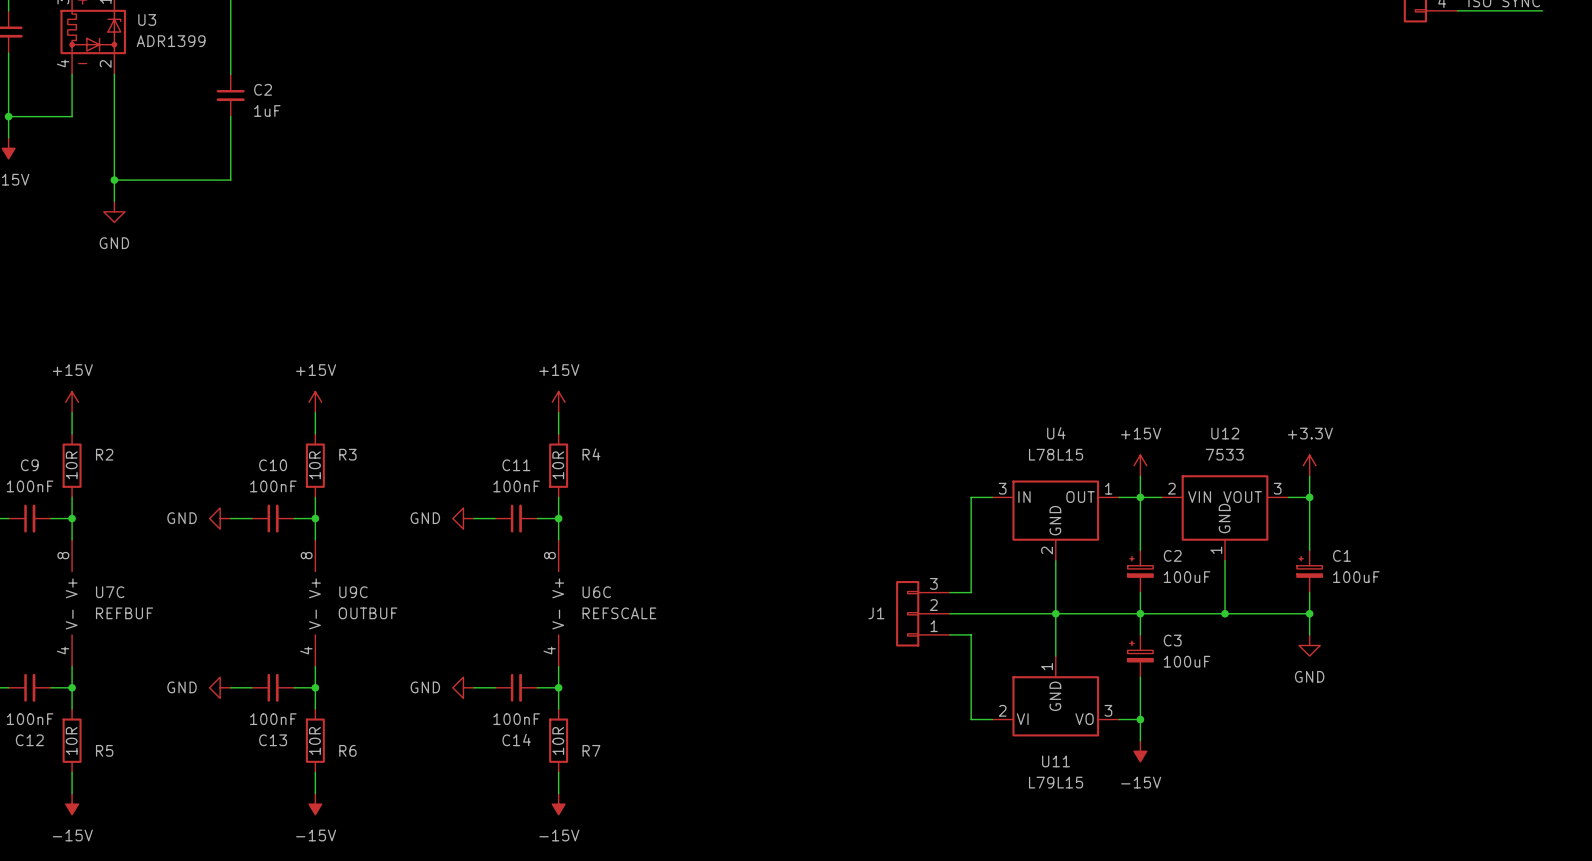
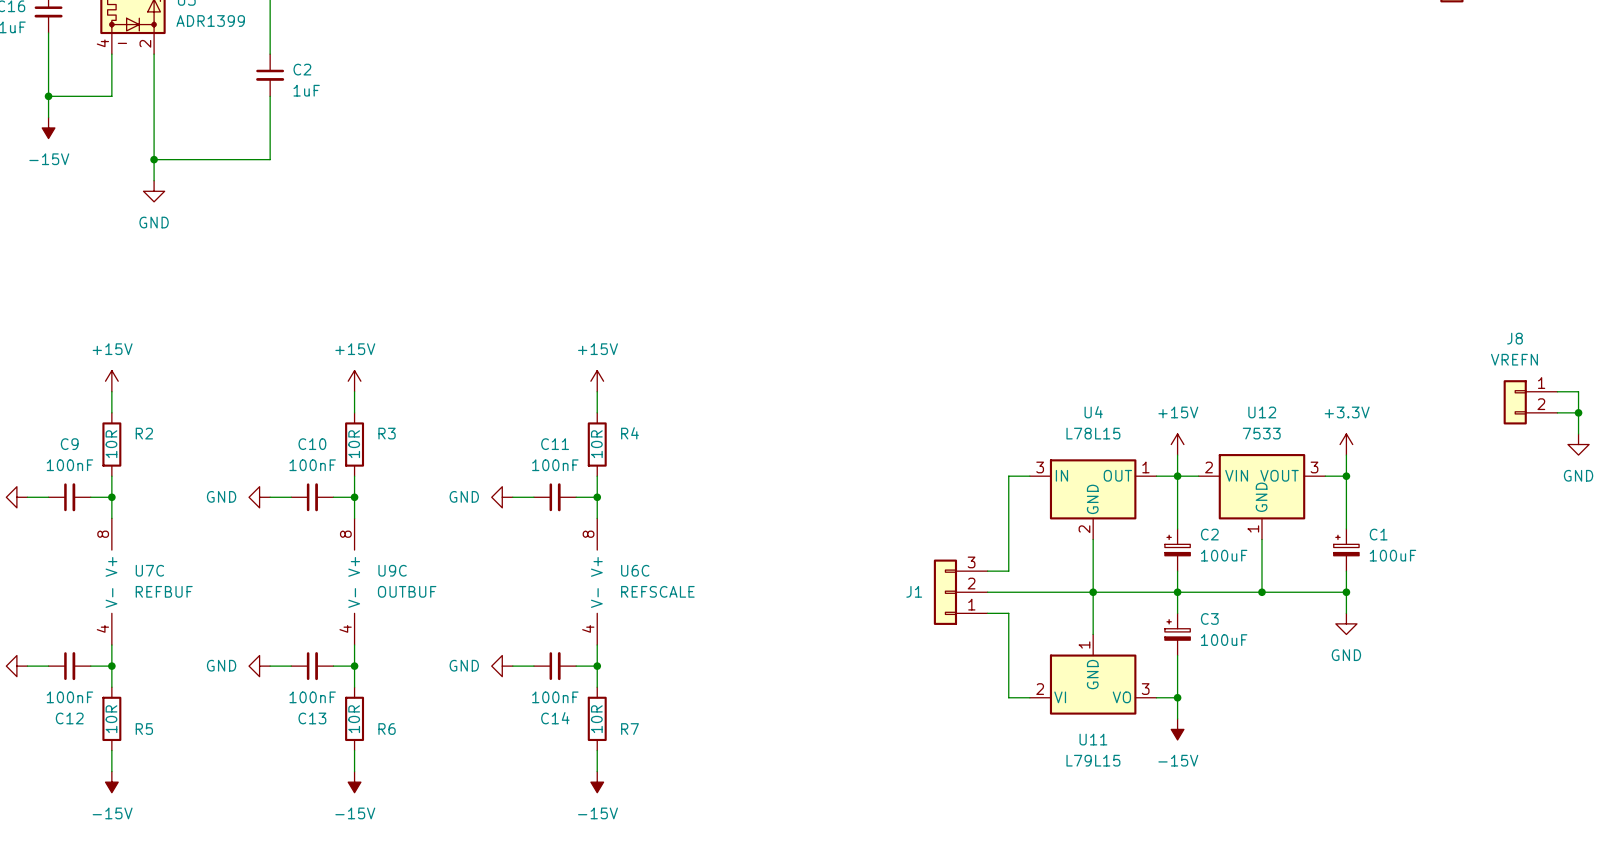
wire: none -> (1557, 391) (1578, 391) (1578, 433)
J8: none -> VREFN (1530, 402)
wire: none -> (1557, 412) (1578, 412)
junction: none -> (1578, 412)
power symbol: none -> GND (1578, 444)

